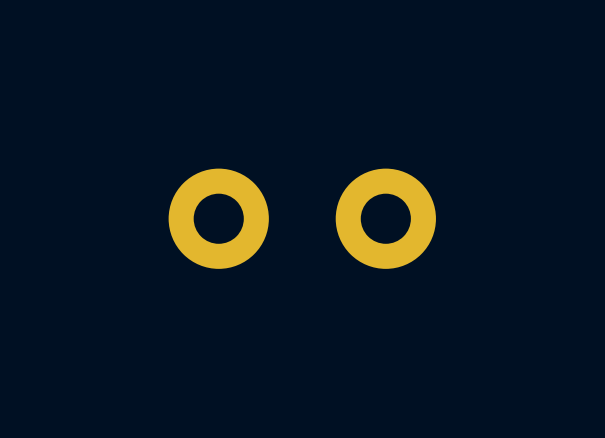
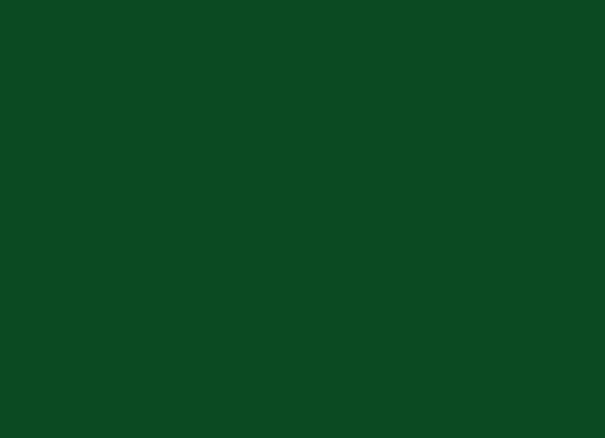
part: (302, 218) -> none

